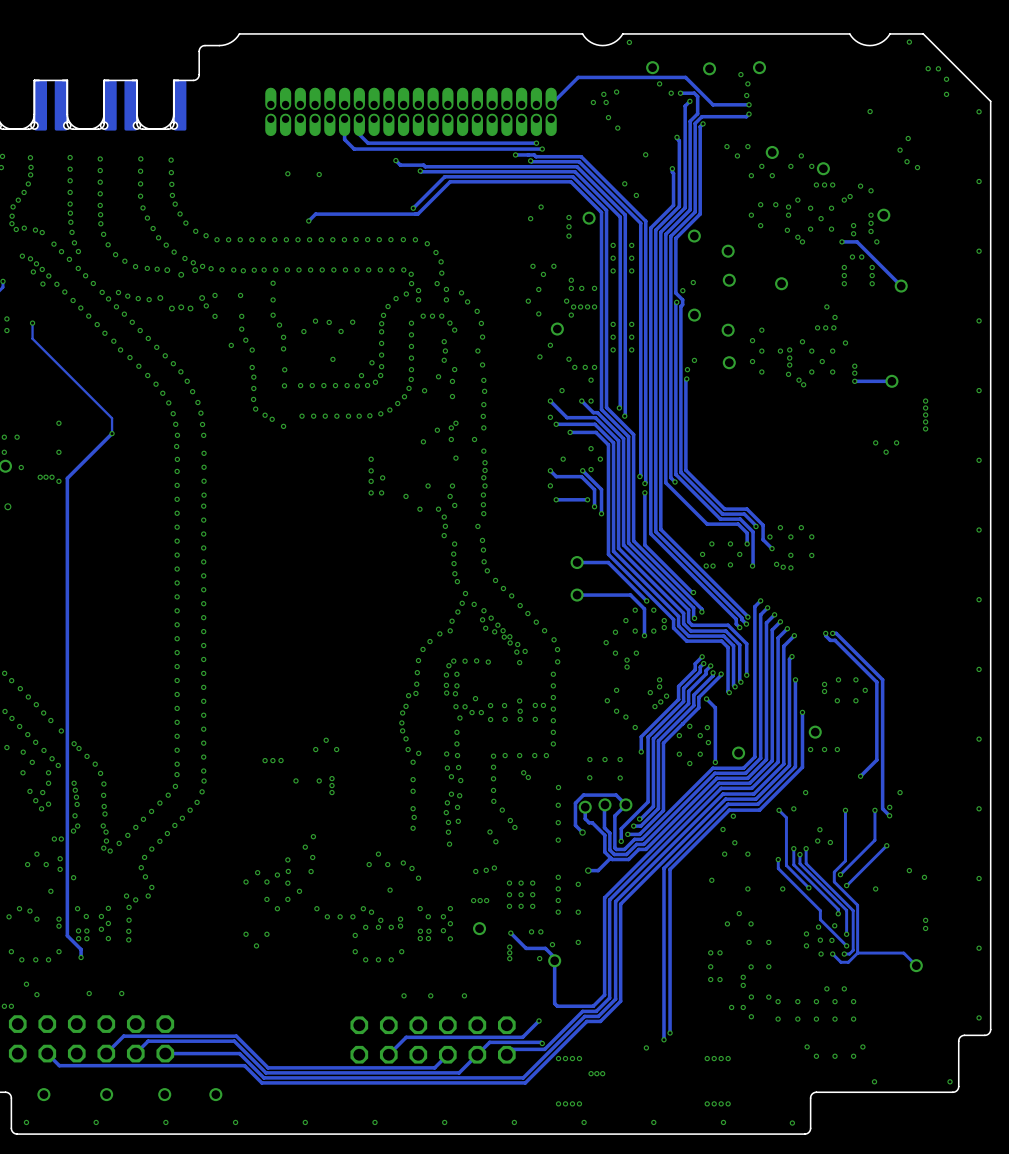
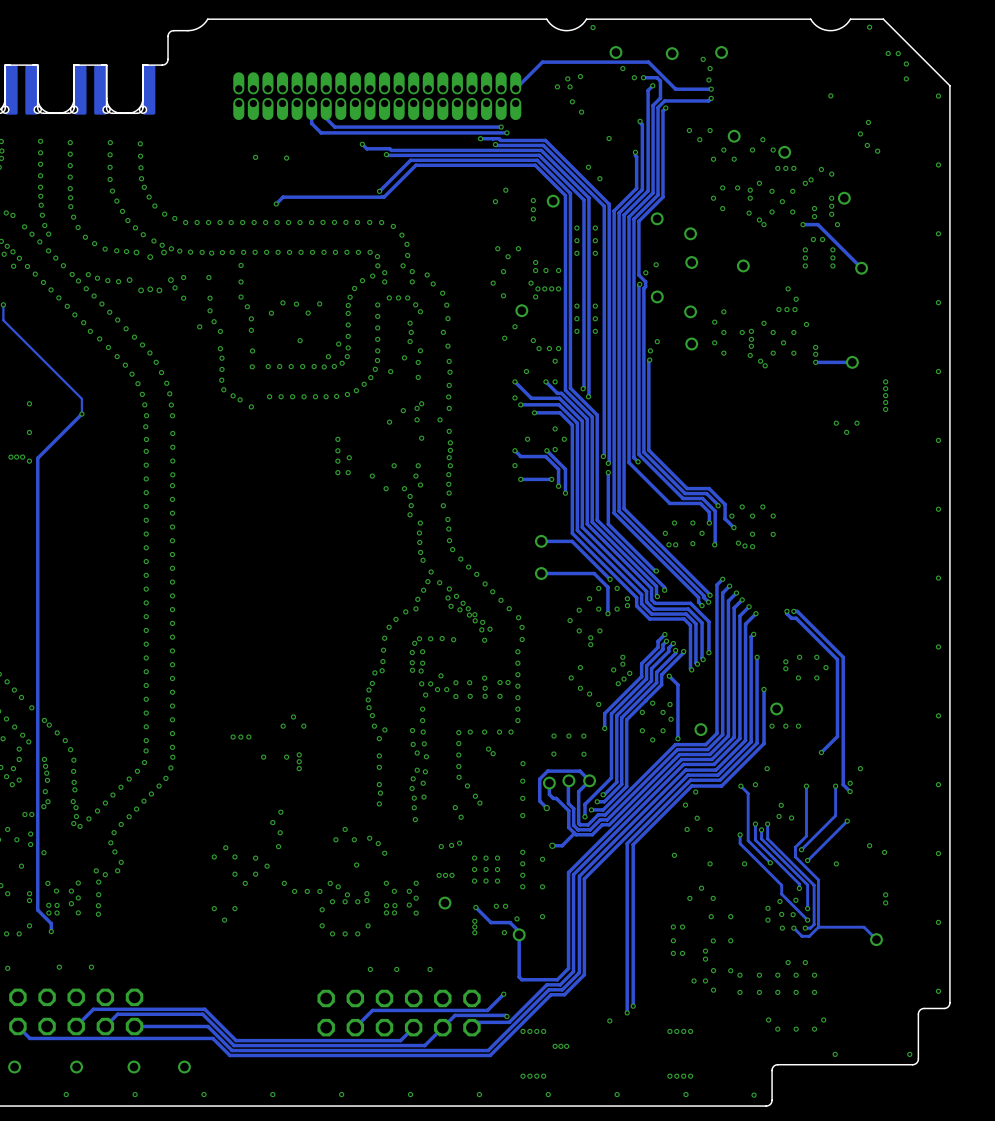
via: (287, 859) -> none
via: (288, 871) -> none
via: (277, 875) -> none

